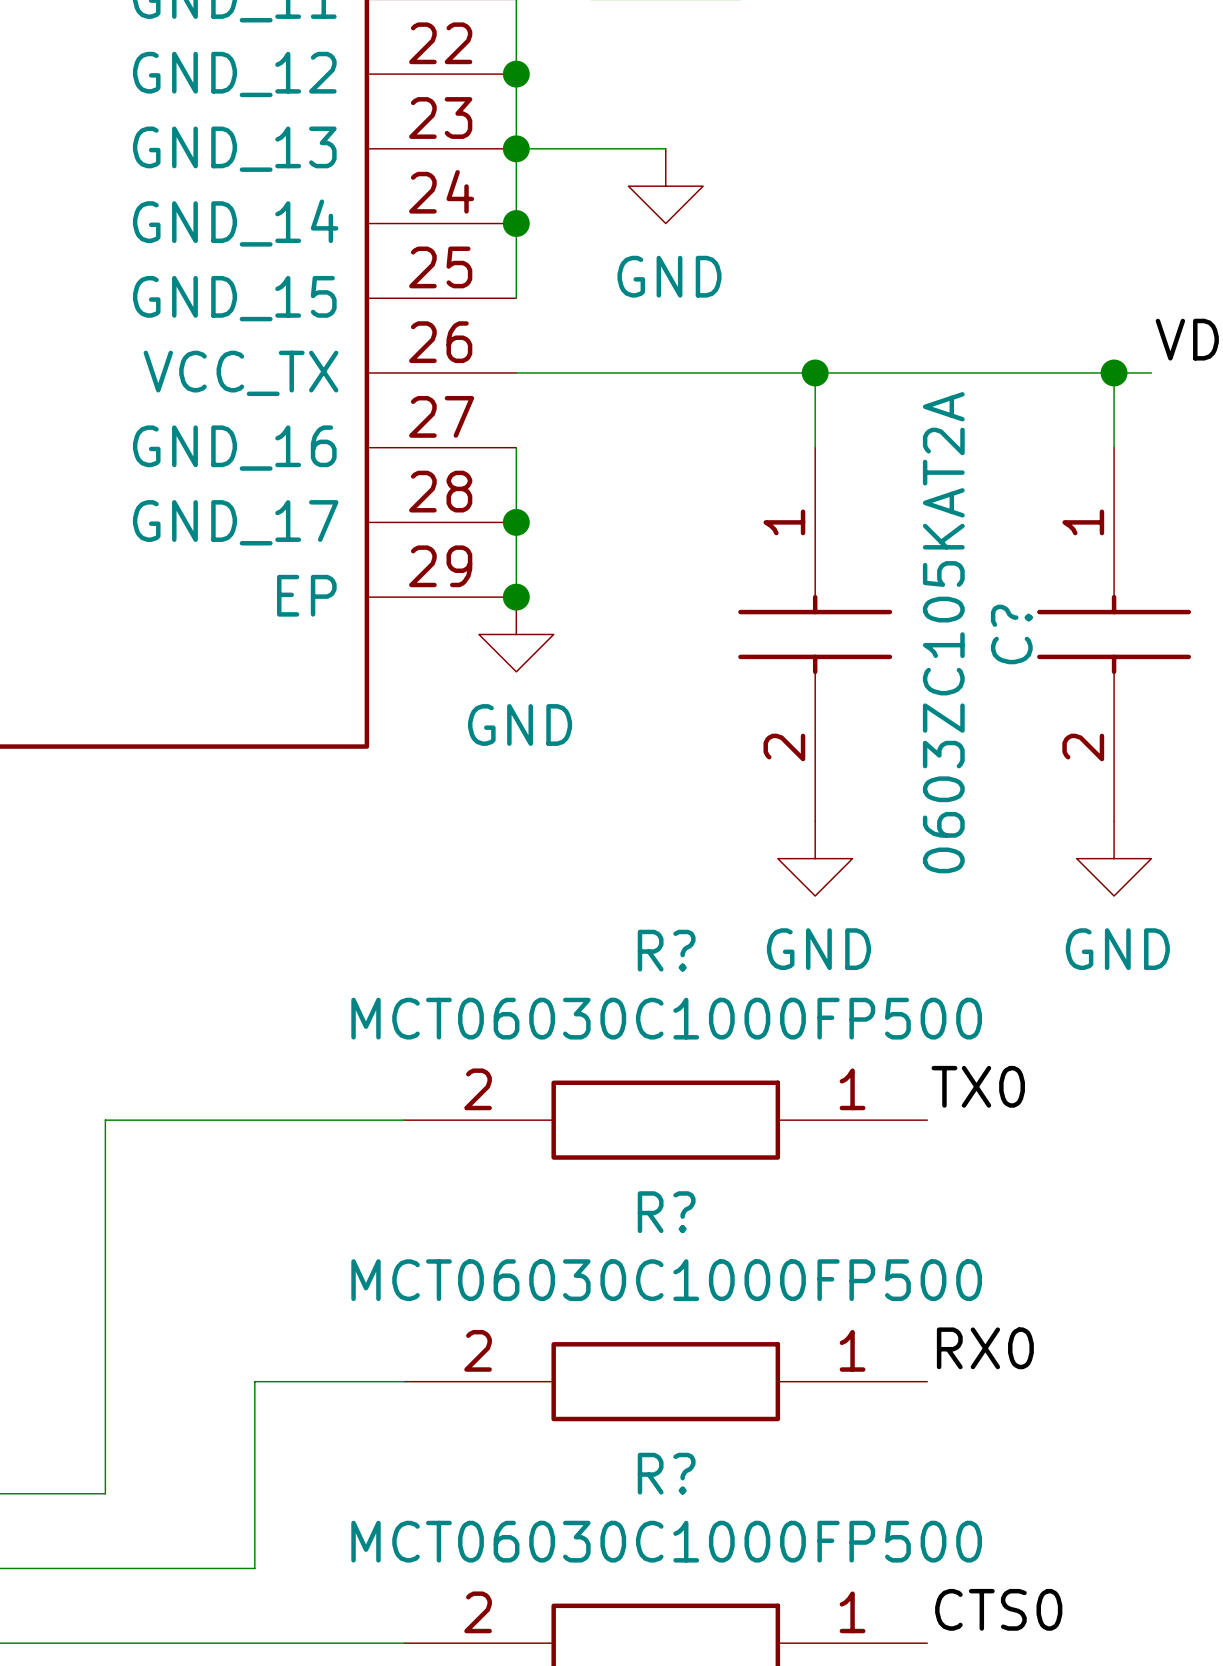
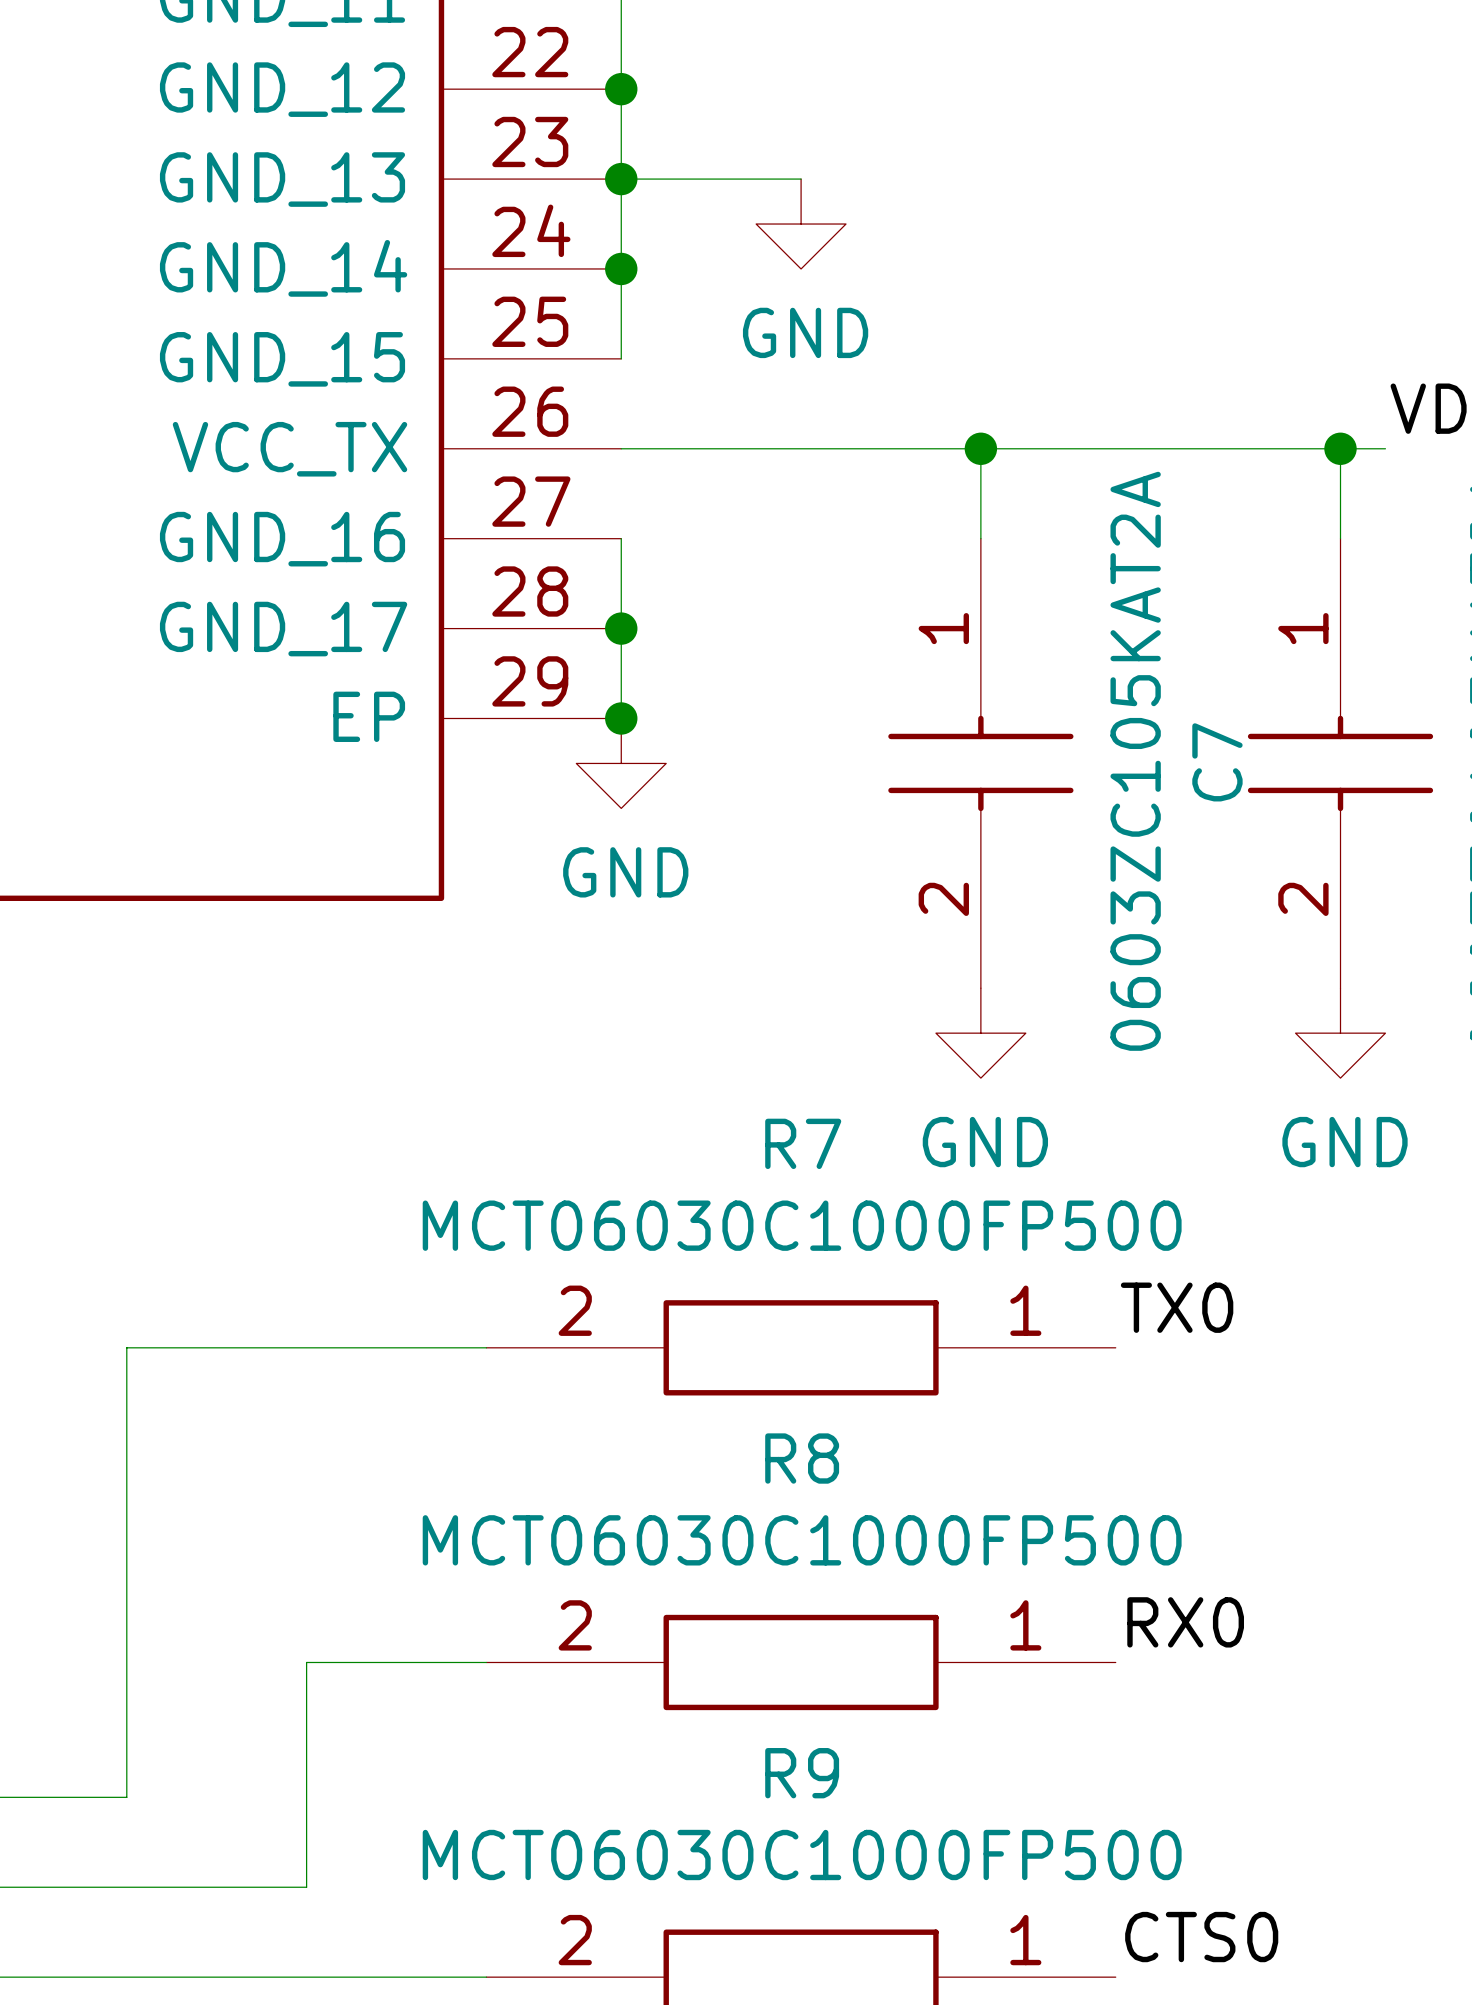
C? name: C? (1011, 634) -> C7 (1217, 762)
R? name: R? (666, 950) -> R7 (803, 1143)
R? name: R? (666, 1212) -> R8 (802, 1458)
R? name: R? (666, 1473) -> R9 (802, 1773)

